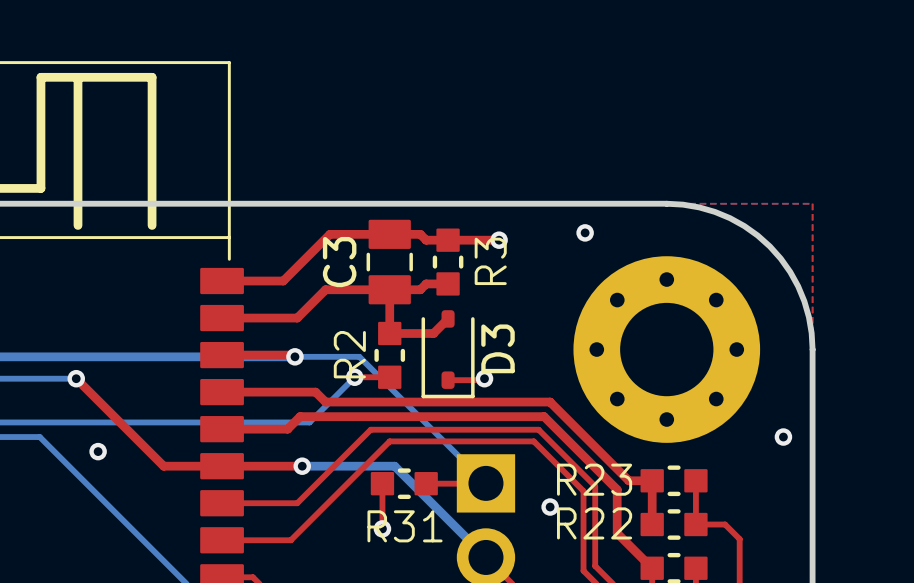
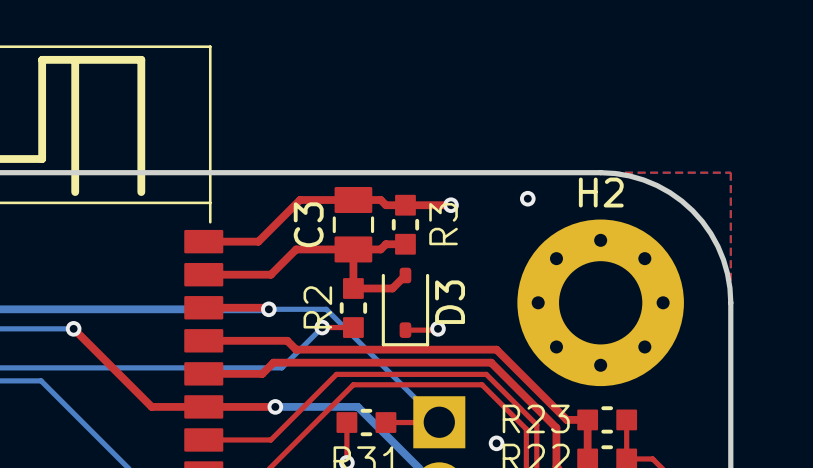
H2 name: none -> H2 (601, 192)
via: (783, 437) -> none
via: (98, 451) -> none

